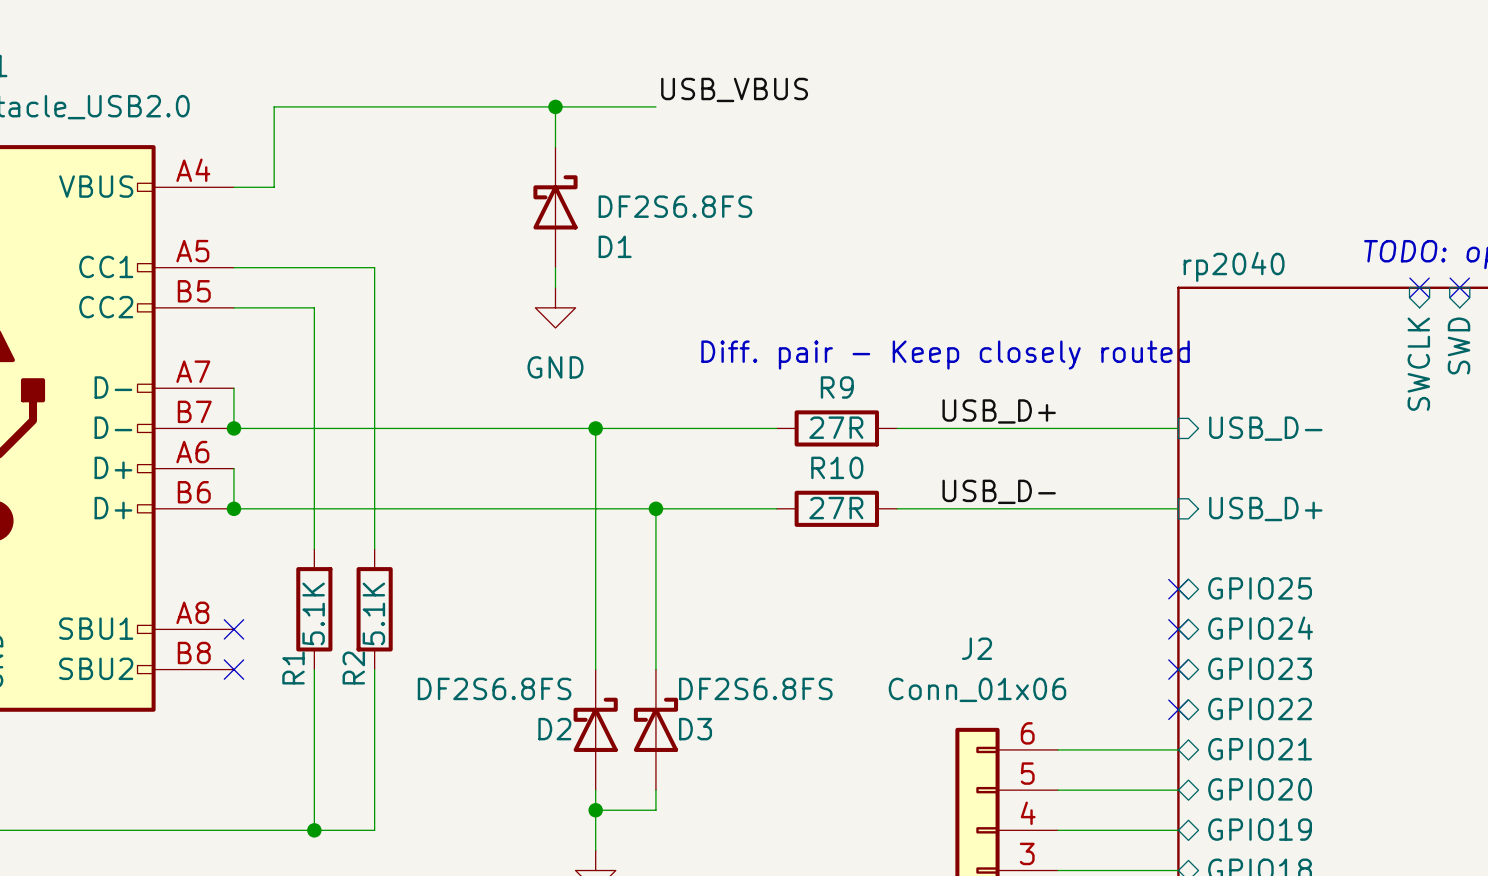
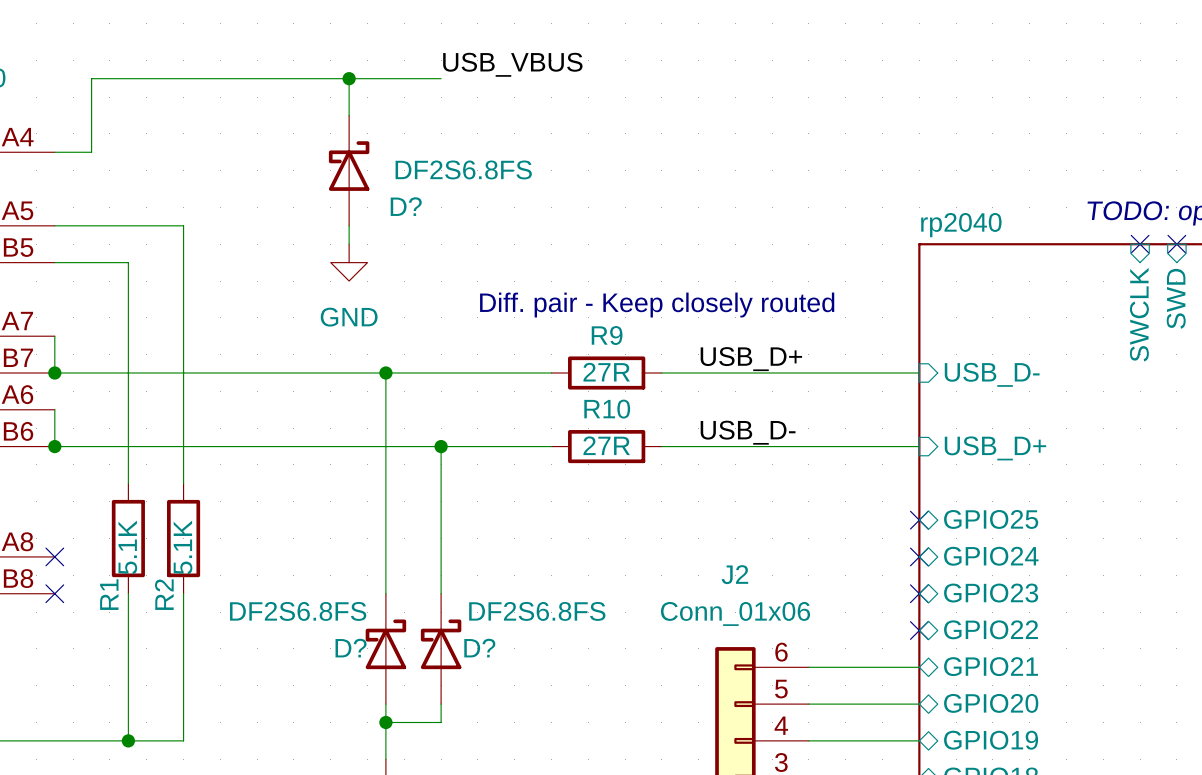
D1 name: D1 (615, 246) -> D? (406, 206)
D2 name: D2 (554, 729) -> D? (351, 648)
D3 name: D3 (695, 729) -> D? (479, 648)

